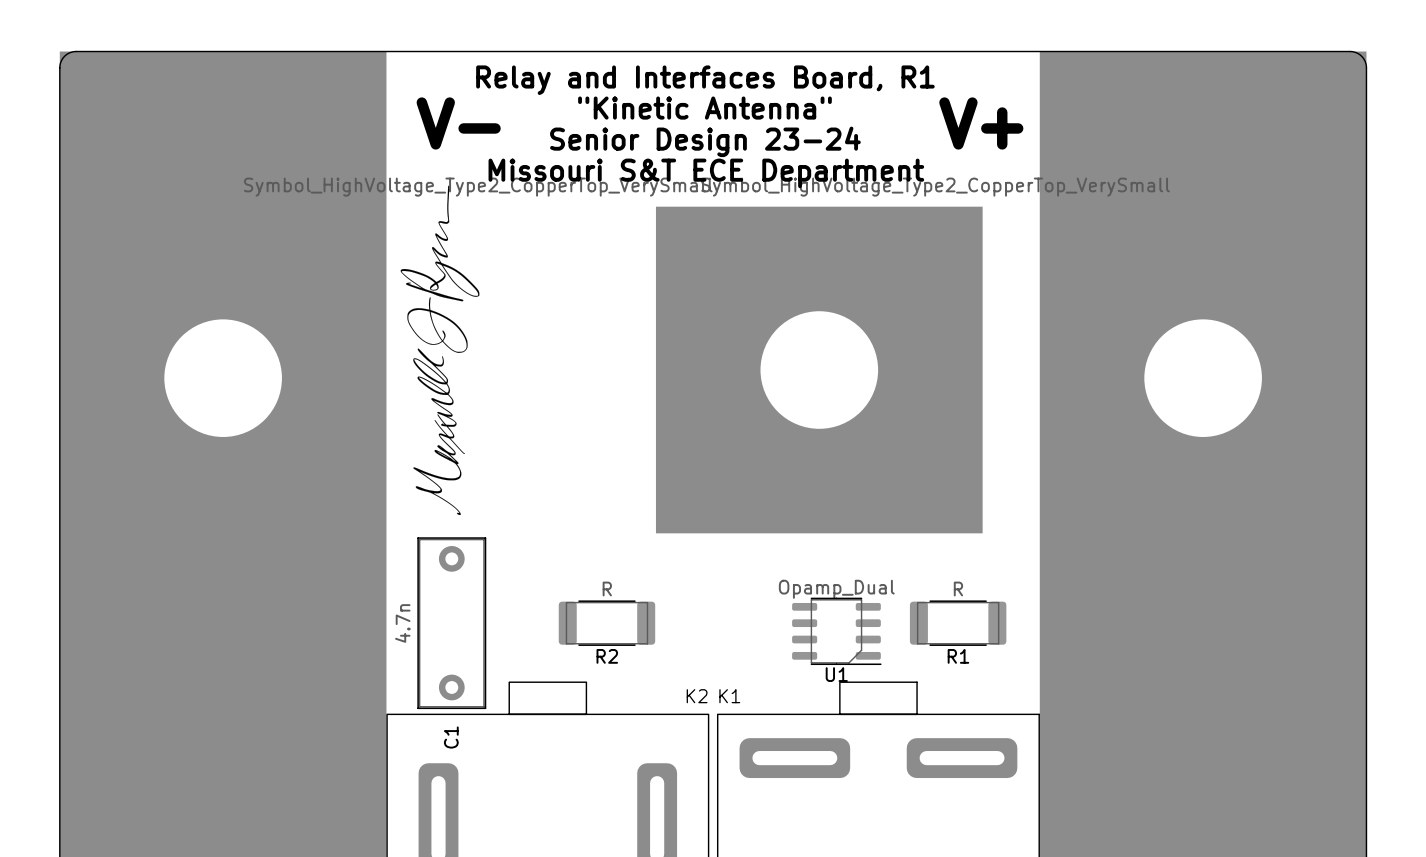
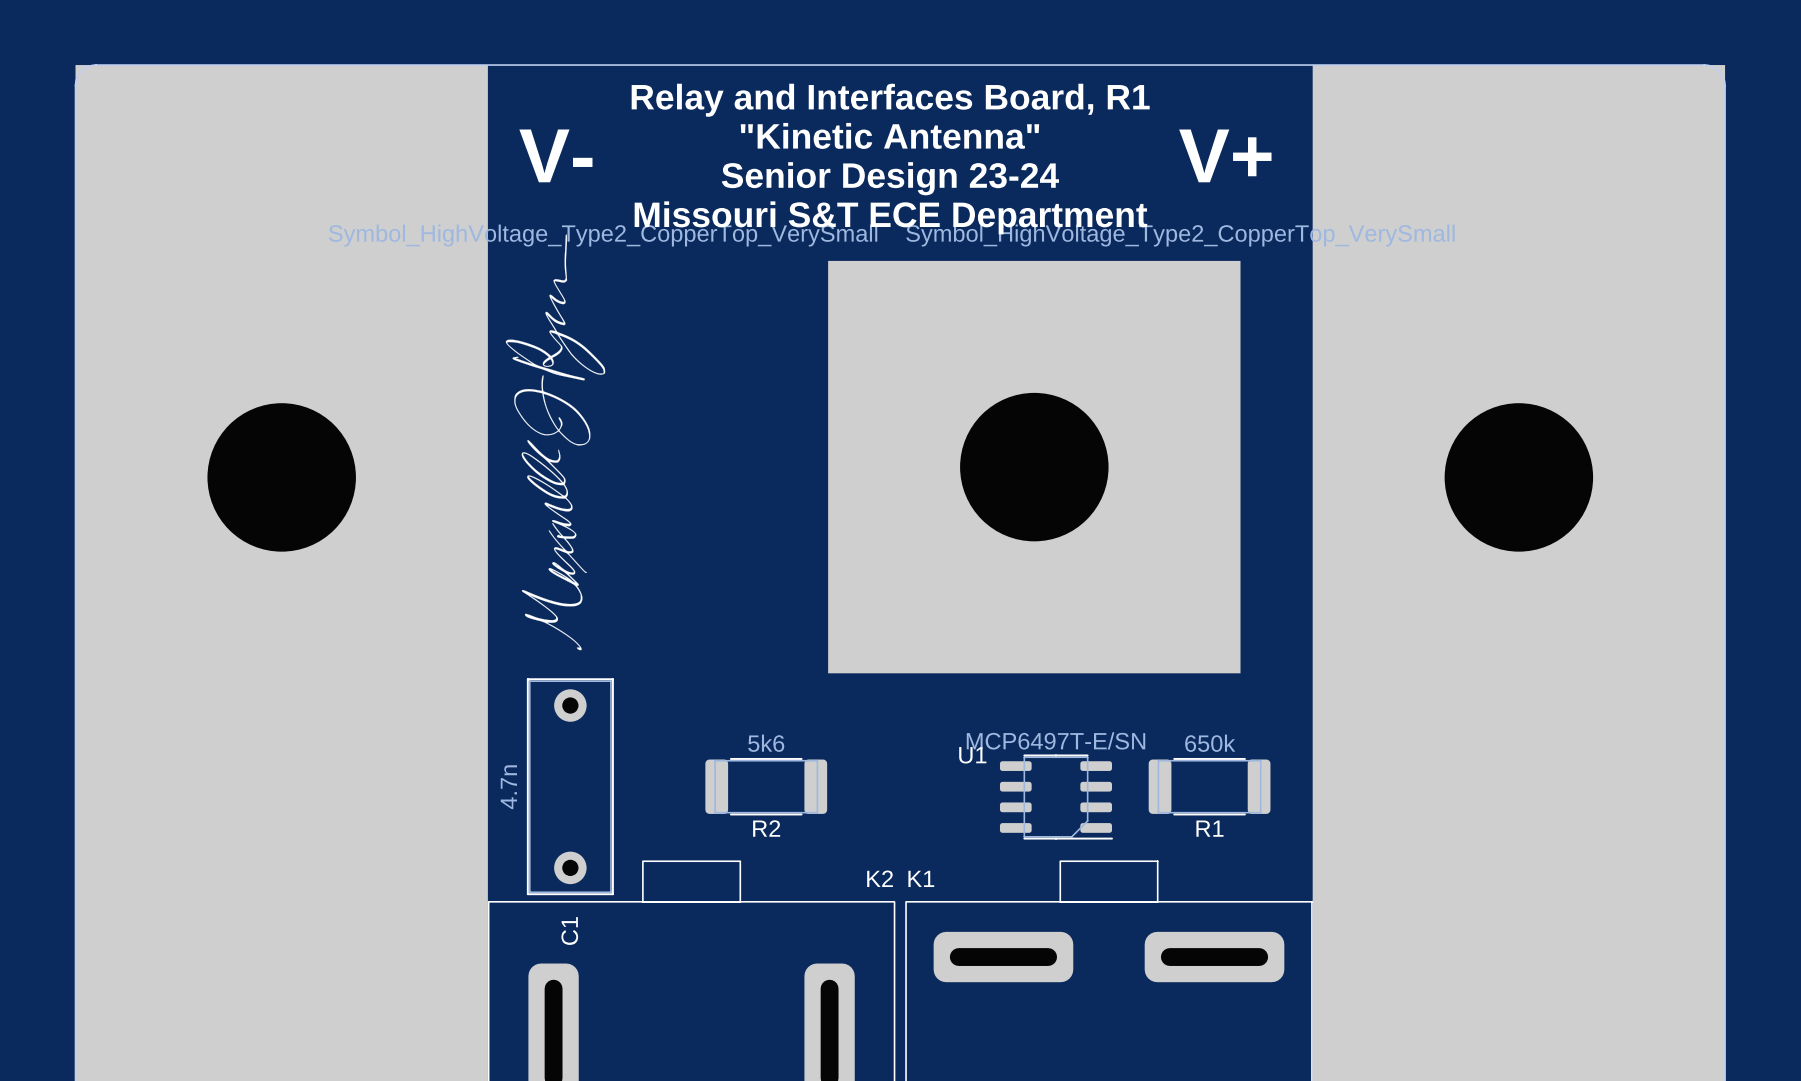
R2 value: R (607, 589) -> 5k6 (766, 743)
U1 value: Opamp_Dual (836, 589) -> MCP6497T-E/SN (1055, 740)
R1 value: R (958, 589) -> 650k (1210, 743)
U1 name position: U1 (836, 674) -> U1 (972, 755)

